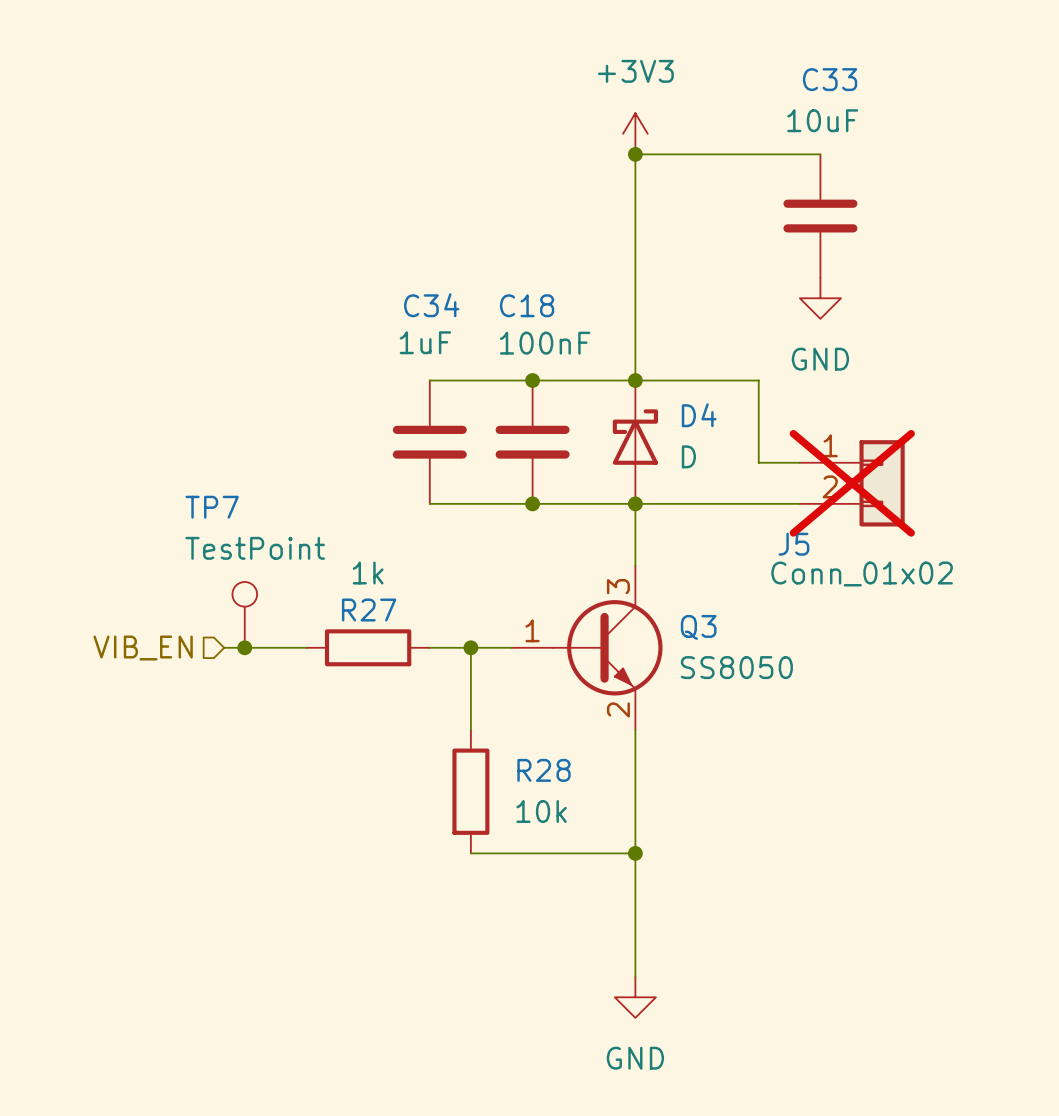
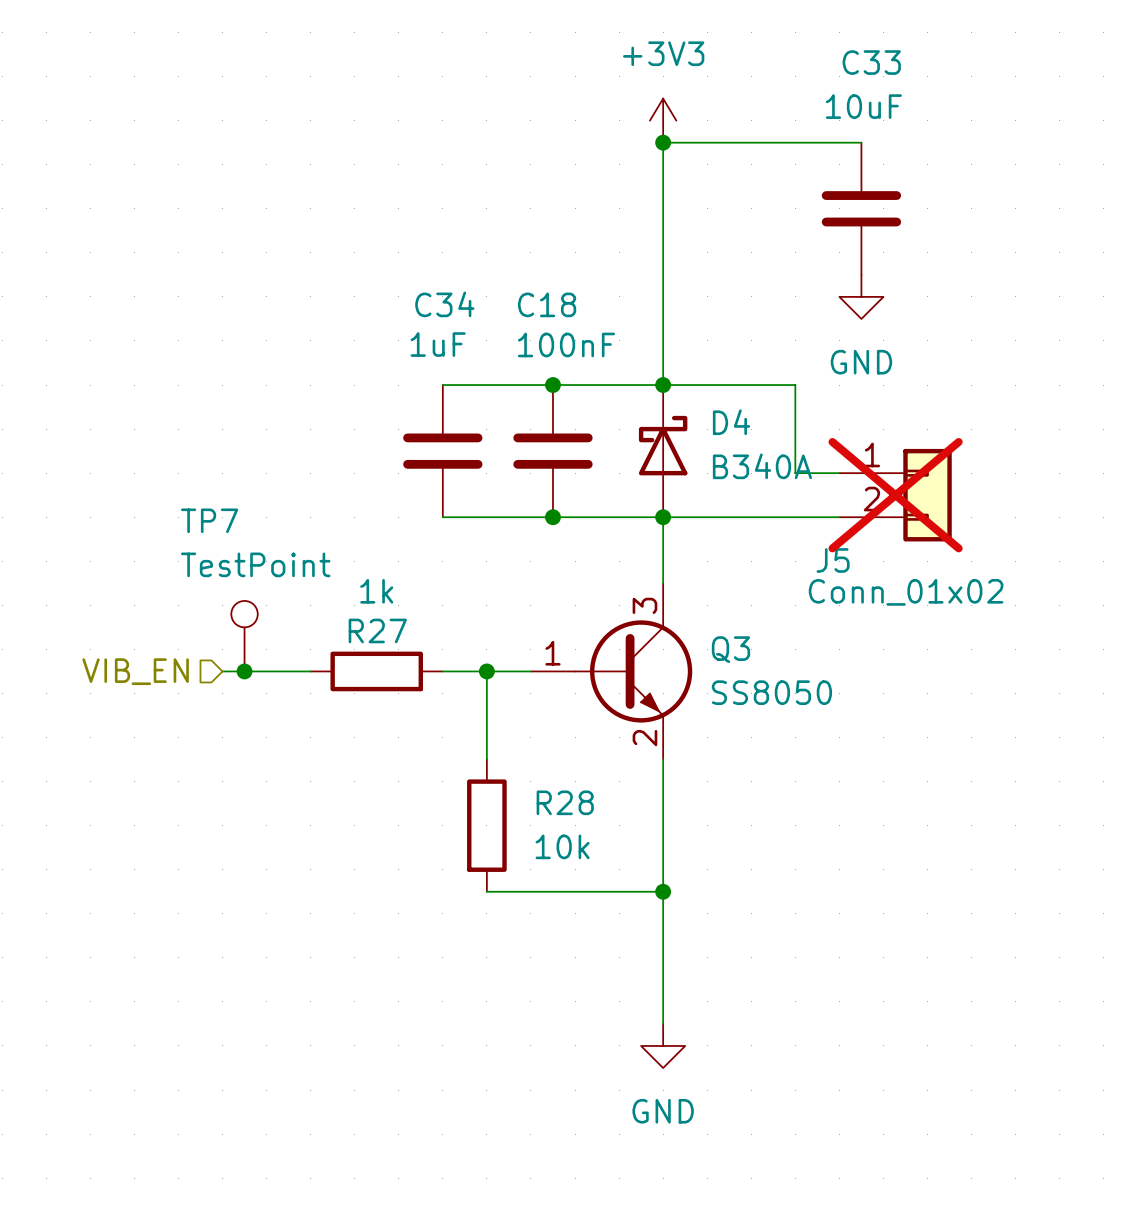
D4 value: D (688, 456) -> B340A (762, 466)

